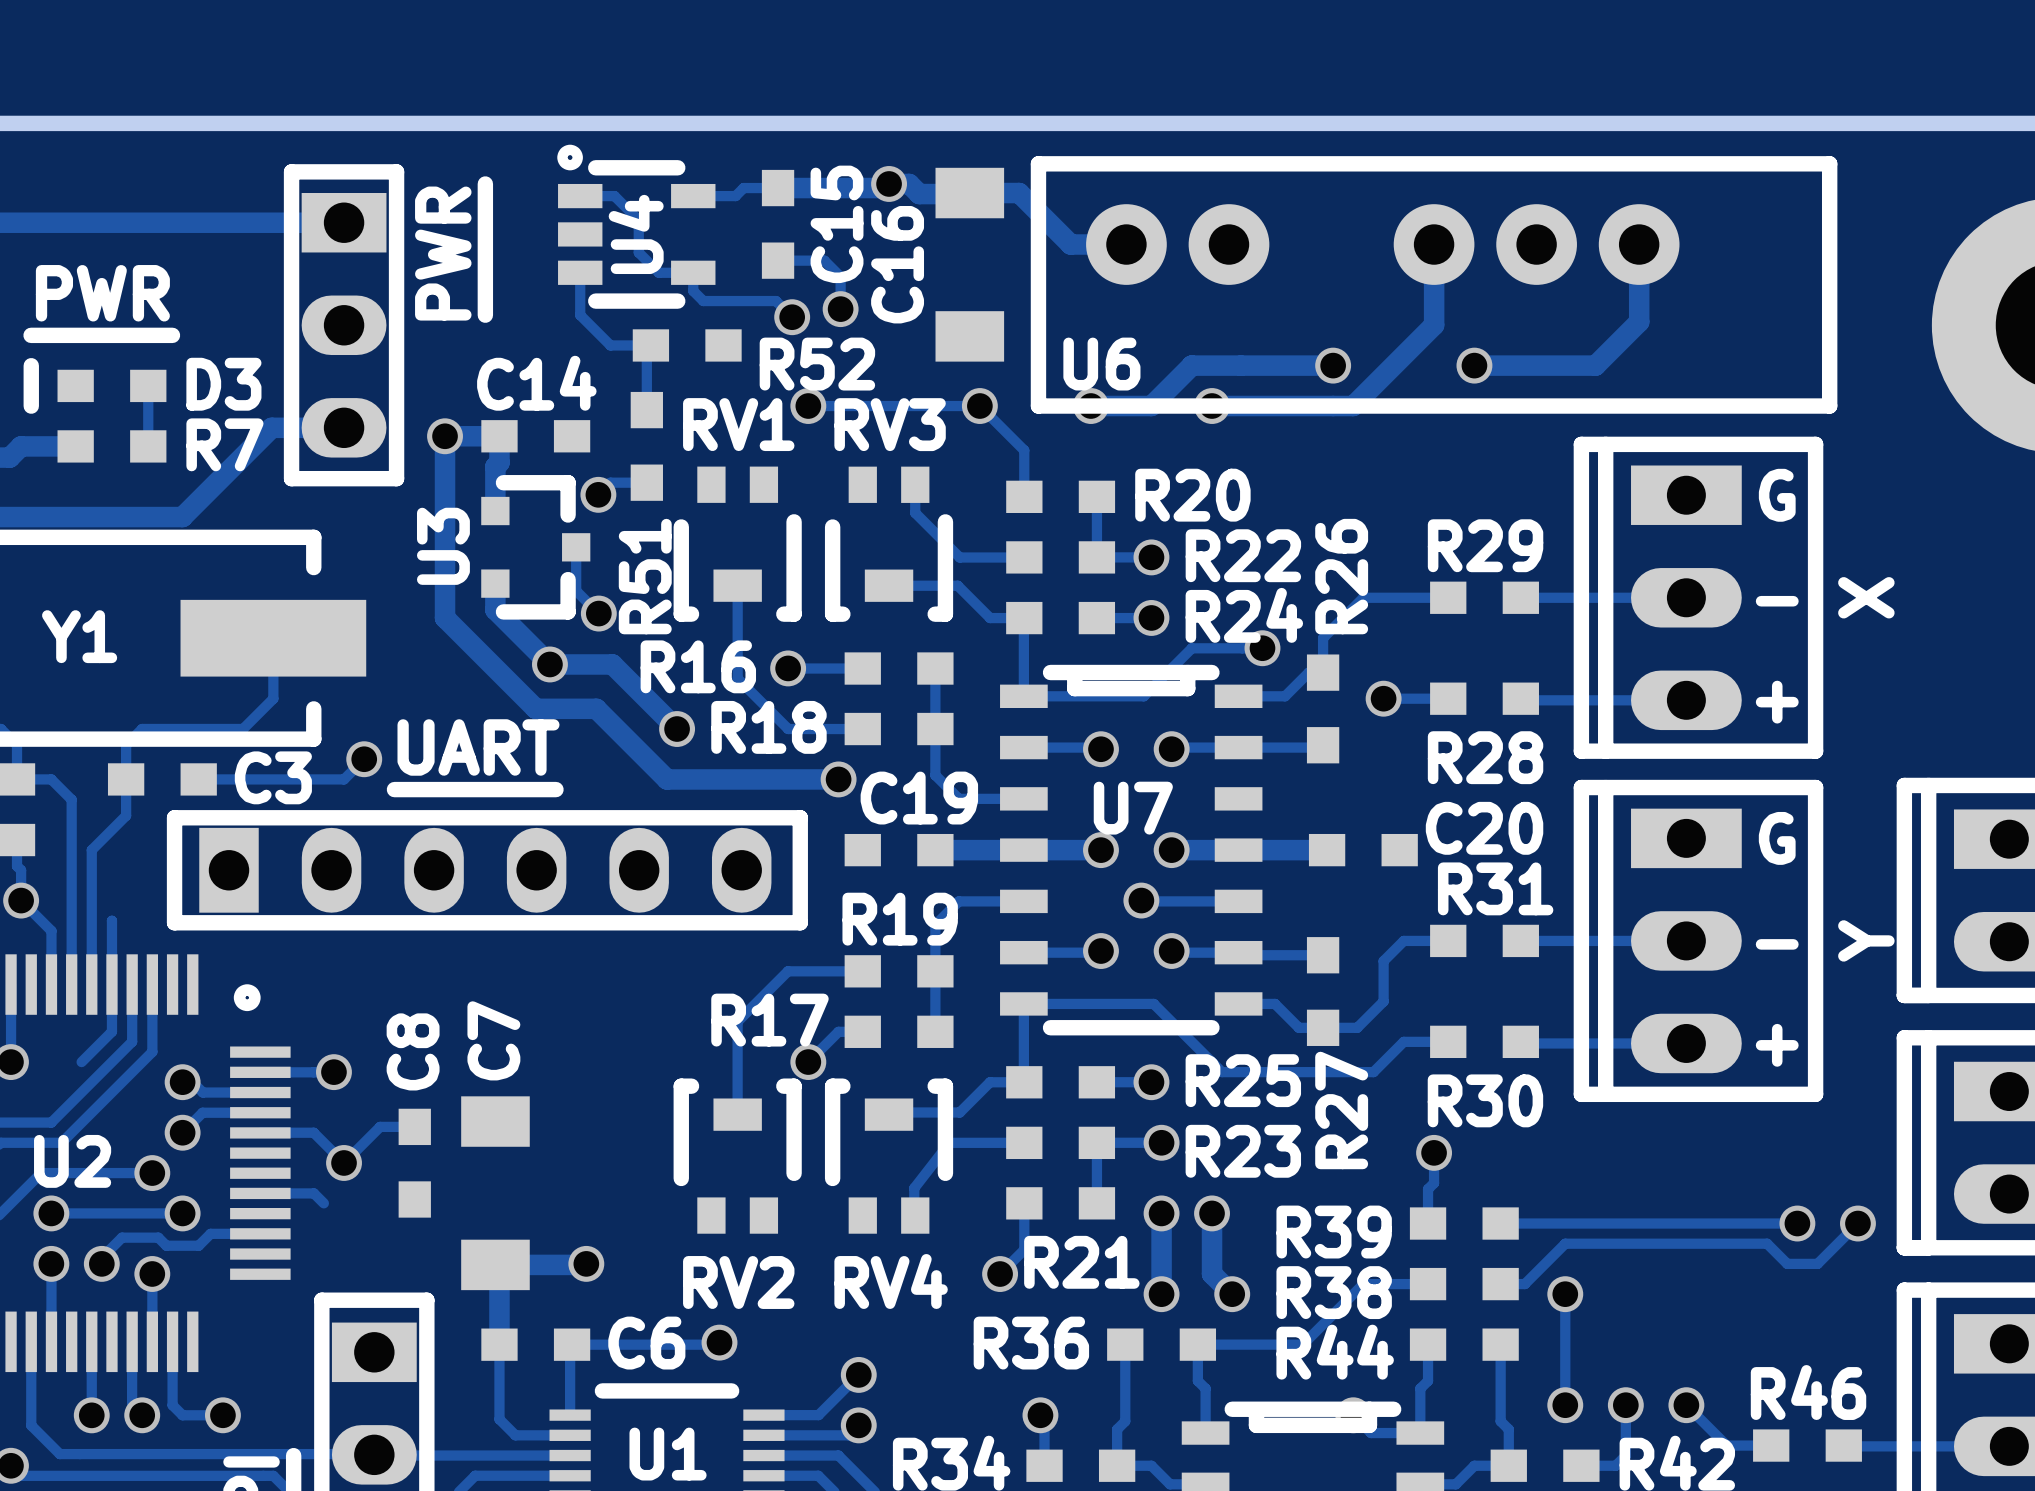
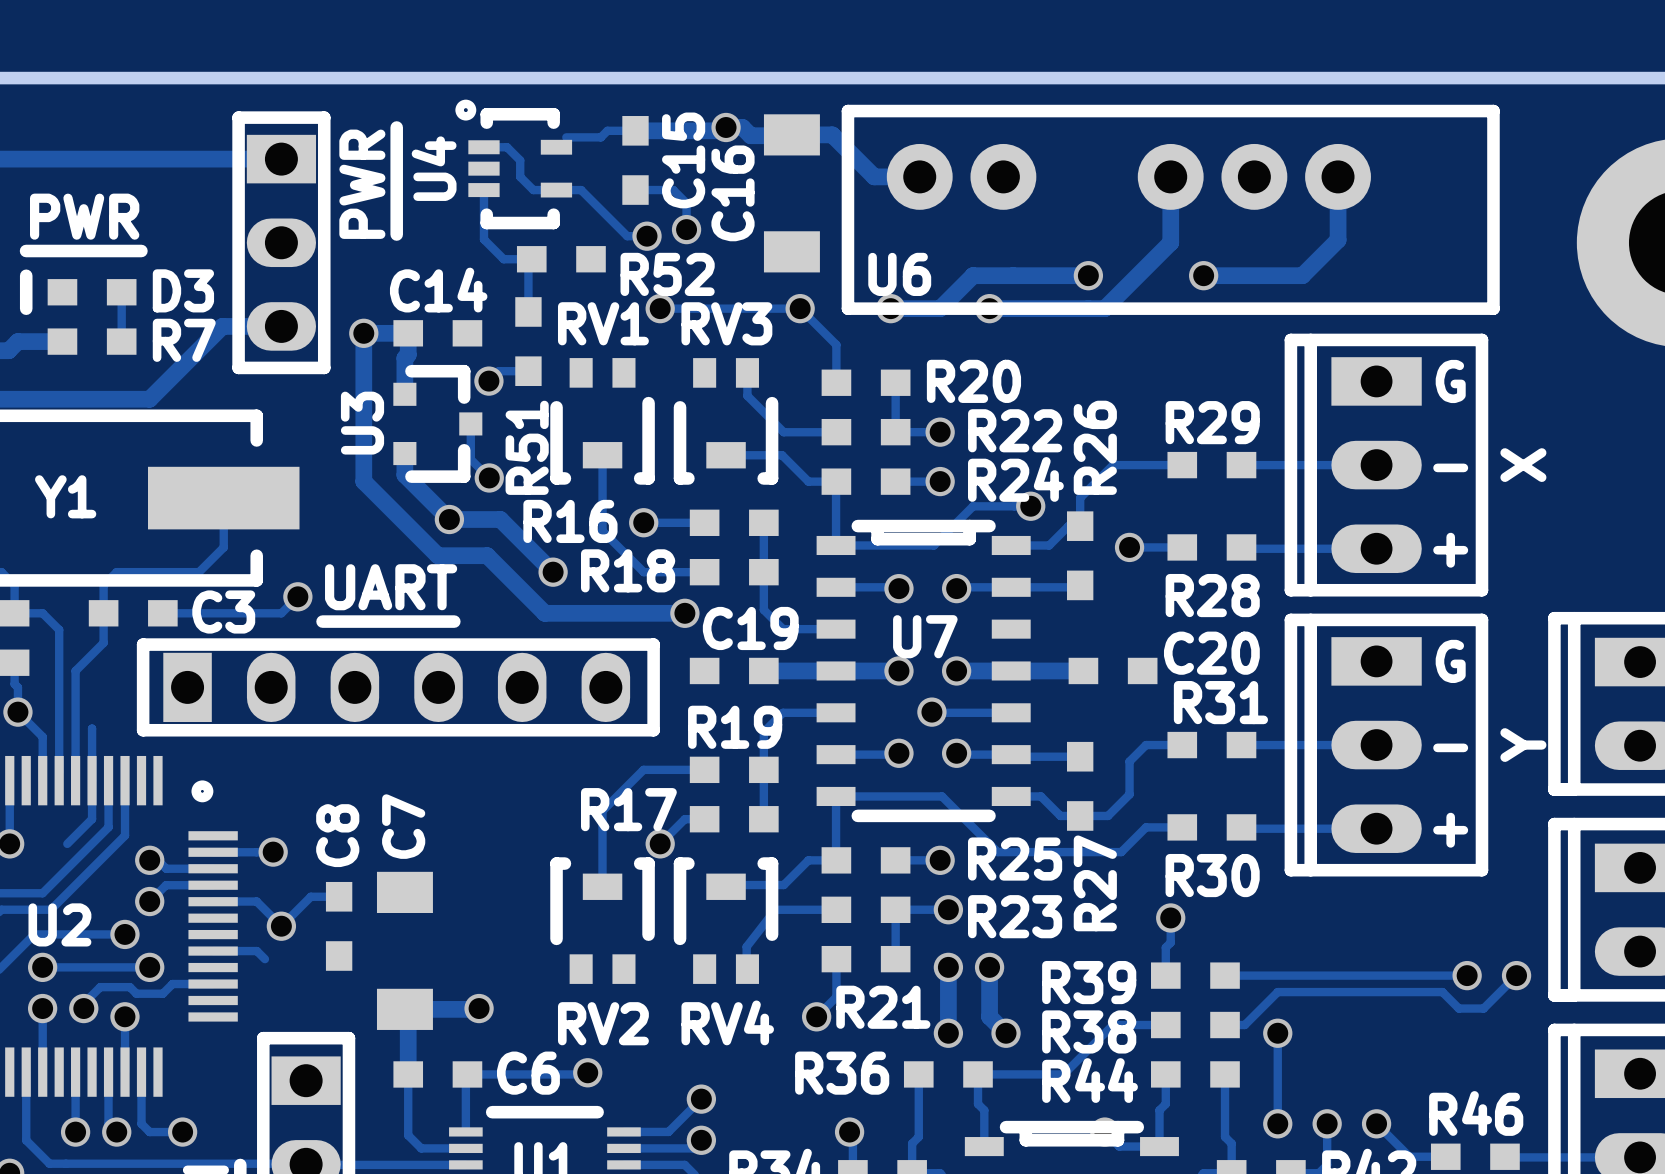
U4 footprint: [557, 144, 716, 309] -> [455, 99, 573, 230]
track: (580, 196) (614, 196) (638, 220) (638, 252) (658, 272) (693, 272) (693, 290) (703, 301) (776, 301) (792, 317) -> (483, 147) (507, 147) (520, 160) (520, 176) (533, 190) (581, 190) (627, 236) (647, 236)
U4 name position: U4 (636, 234) -> U4 (434, 168)
track: (580, 272) (580, 315) (610, 345) (616, 345) -> (483, 190) (483, 239) (503, 259)

